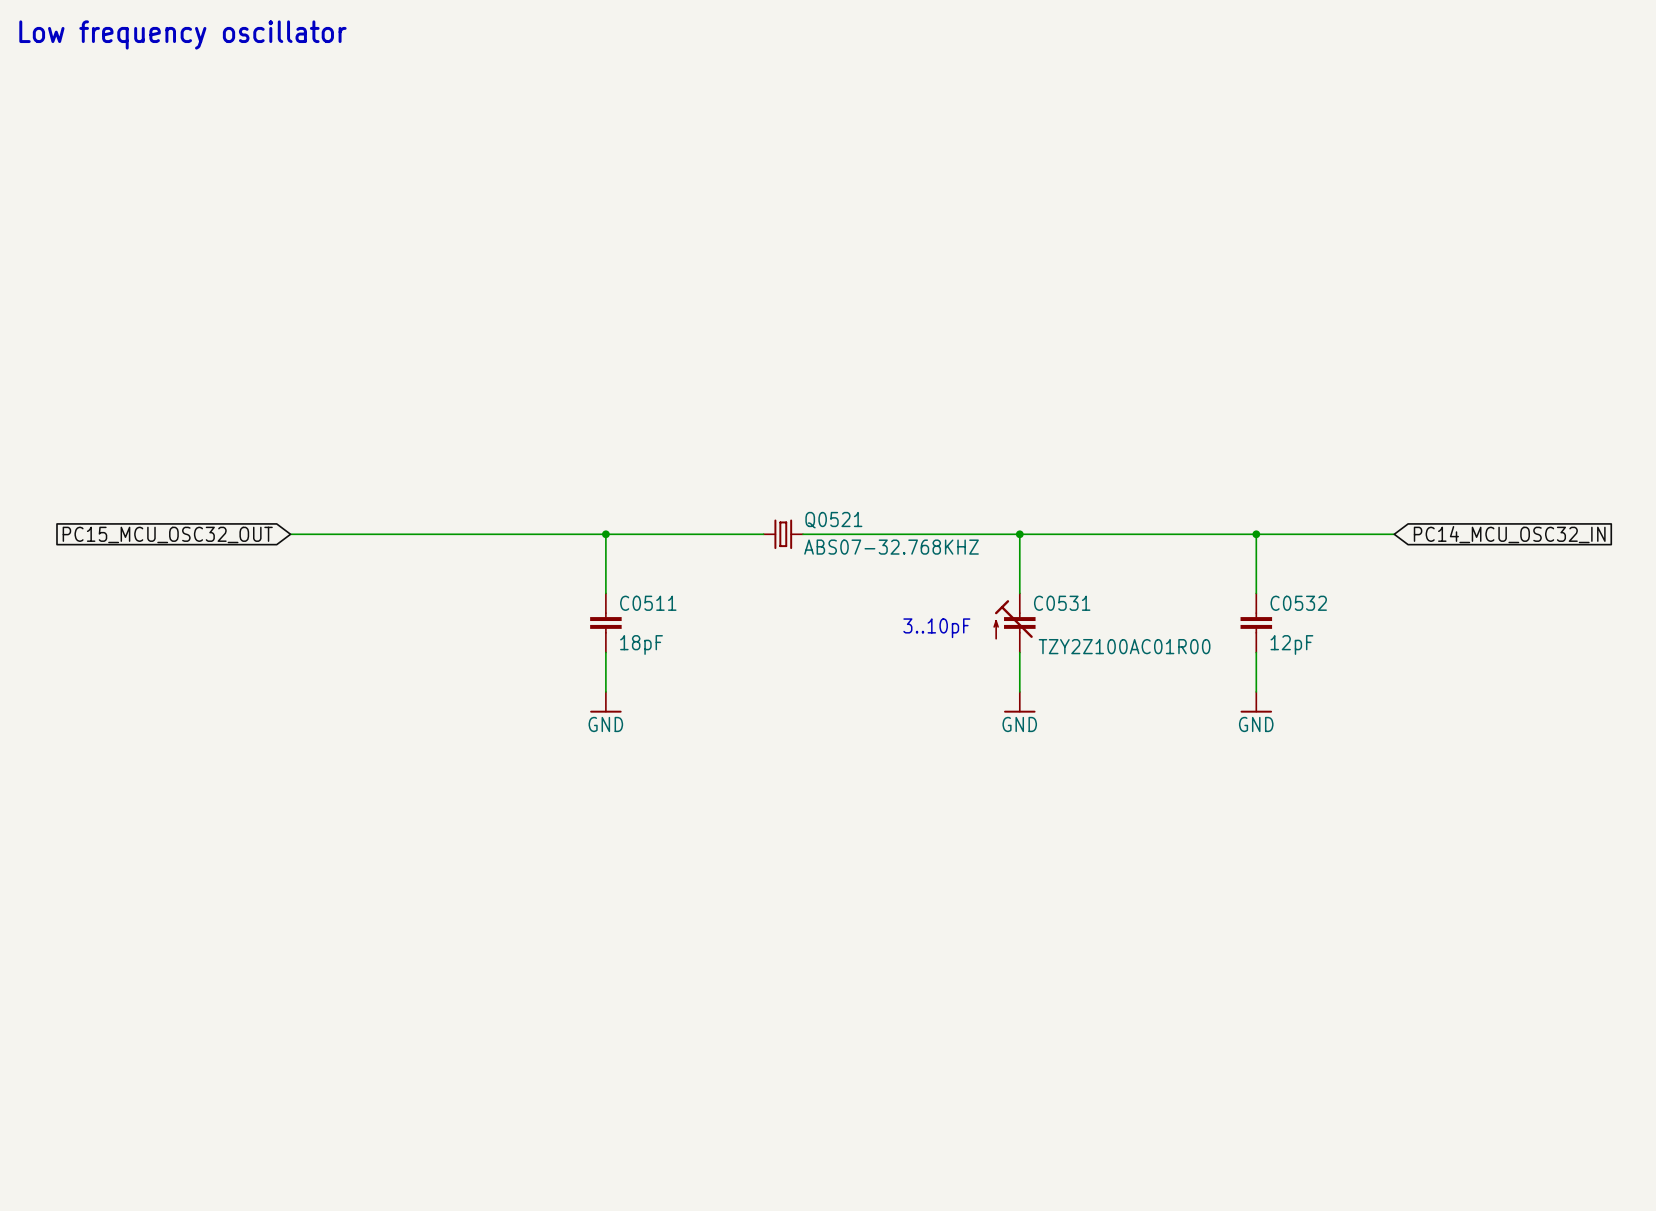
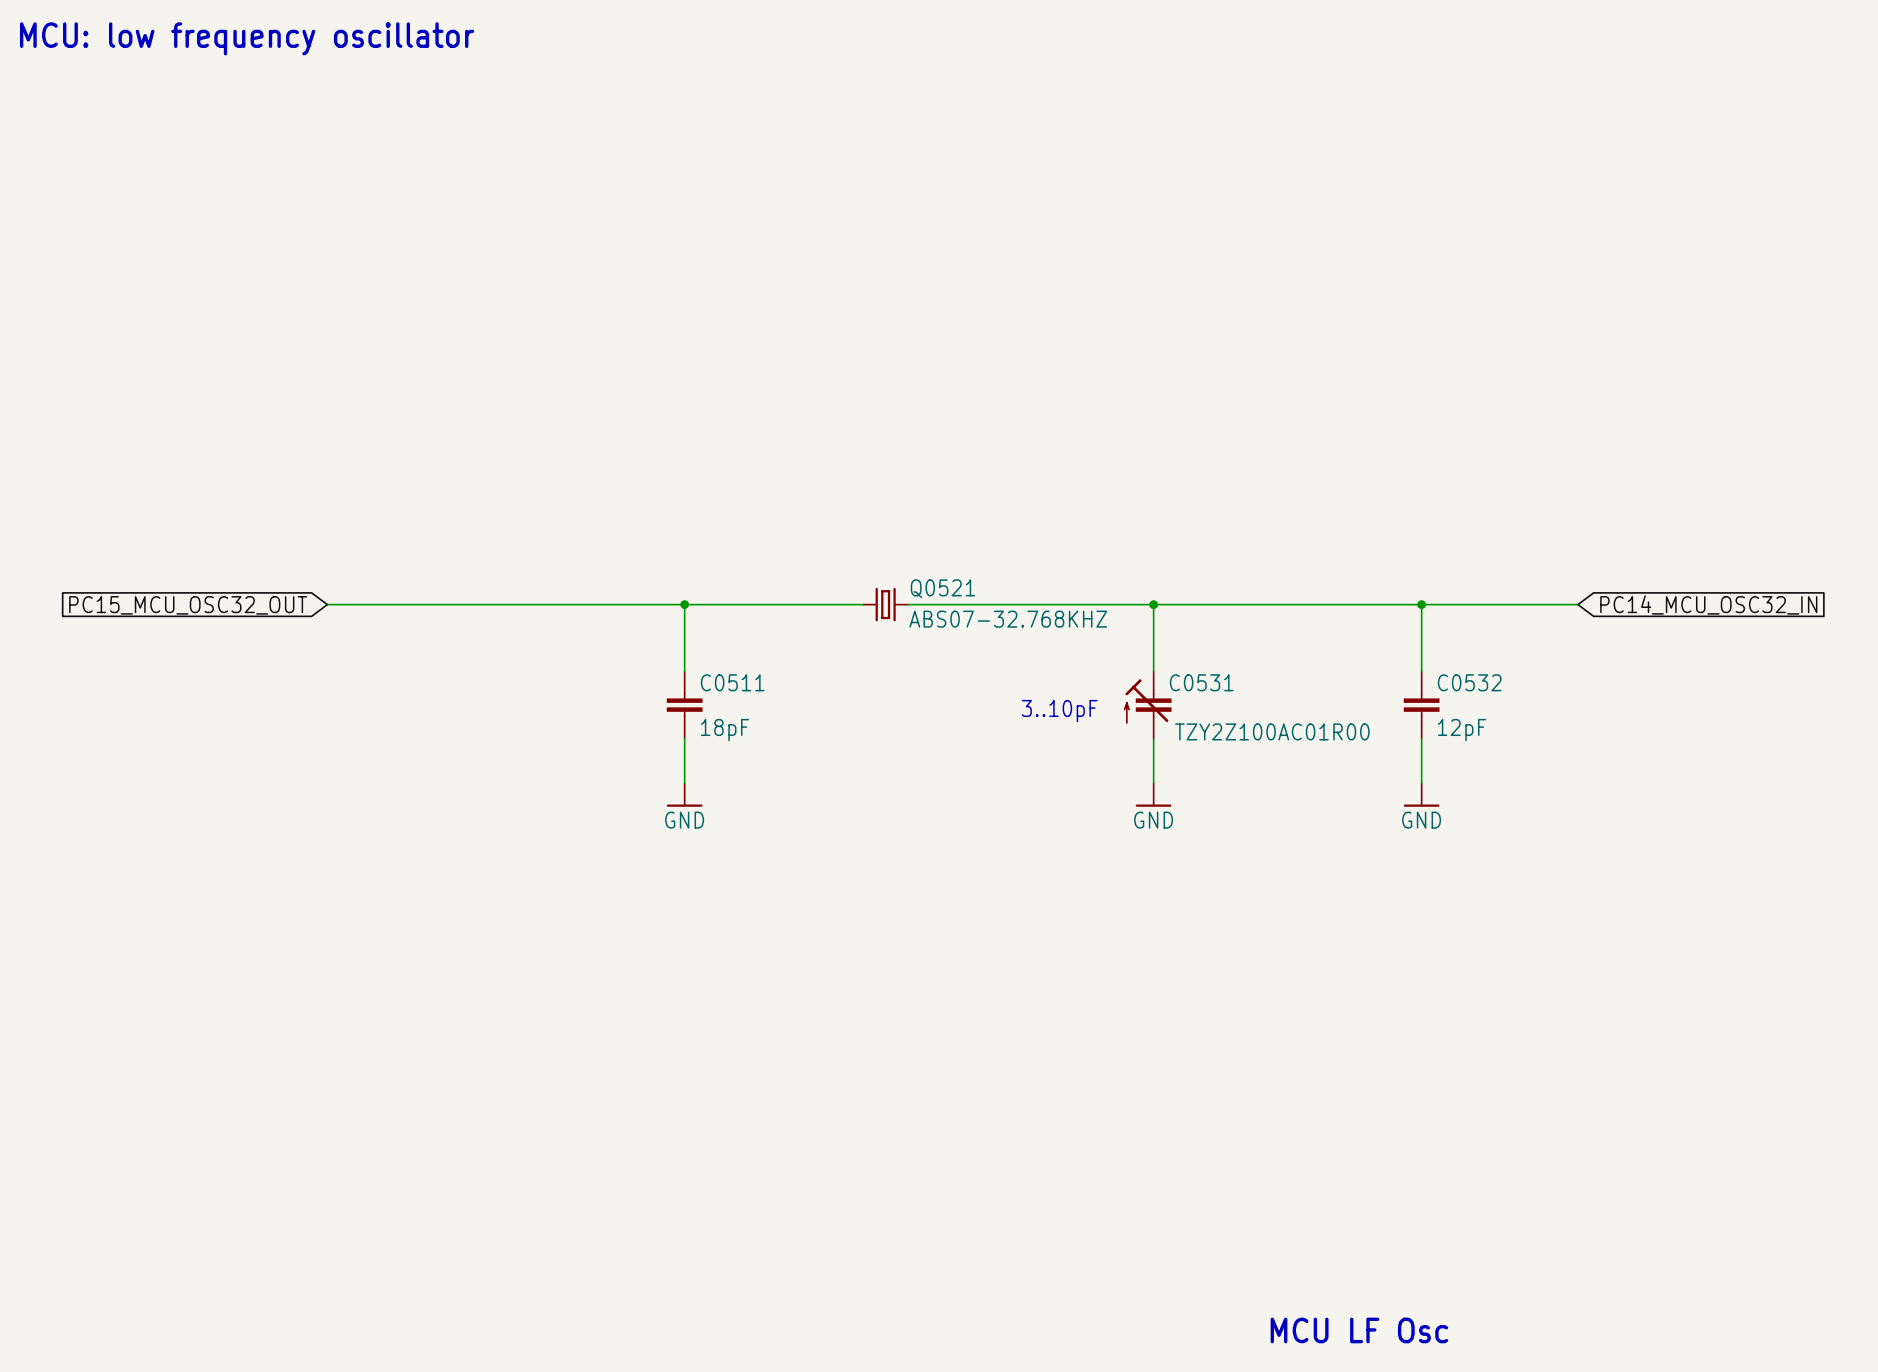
text: Low frequency oscillator (182, 34) -> MCU: low frequency oscillator (247, 38)
text: none -> MCU LF Osc (1359, 1330)

